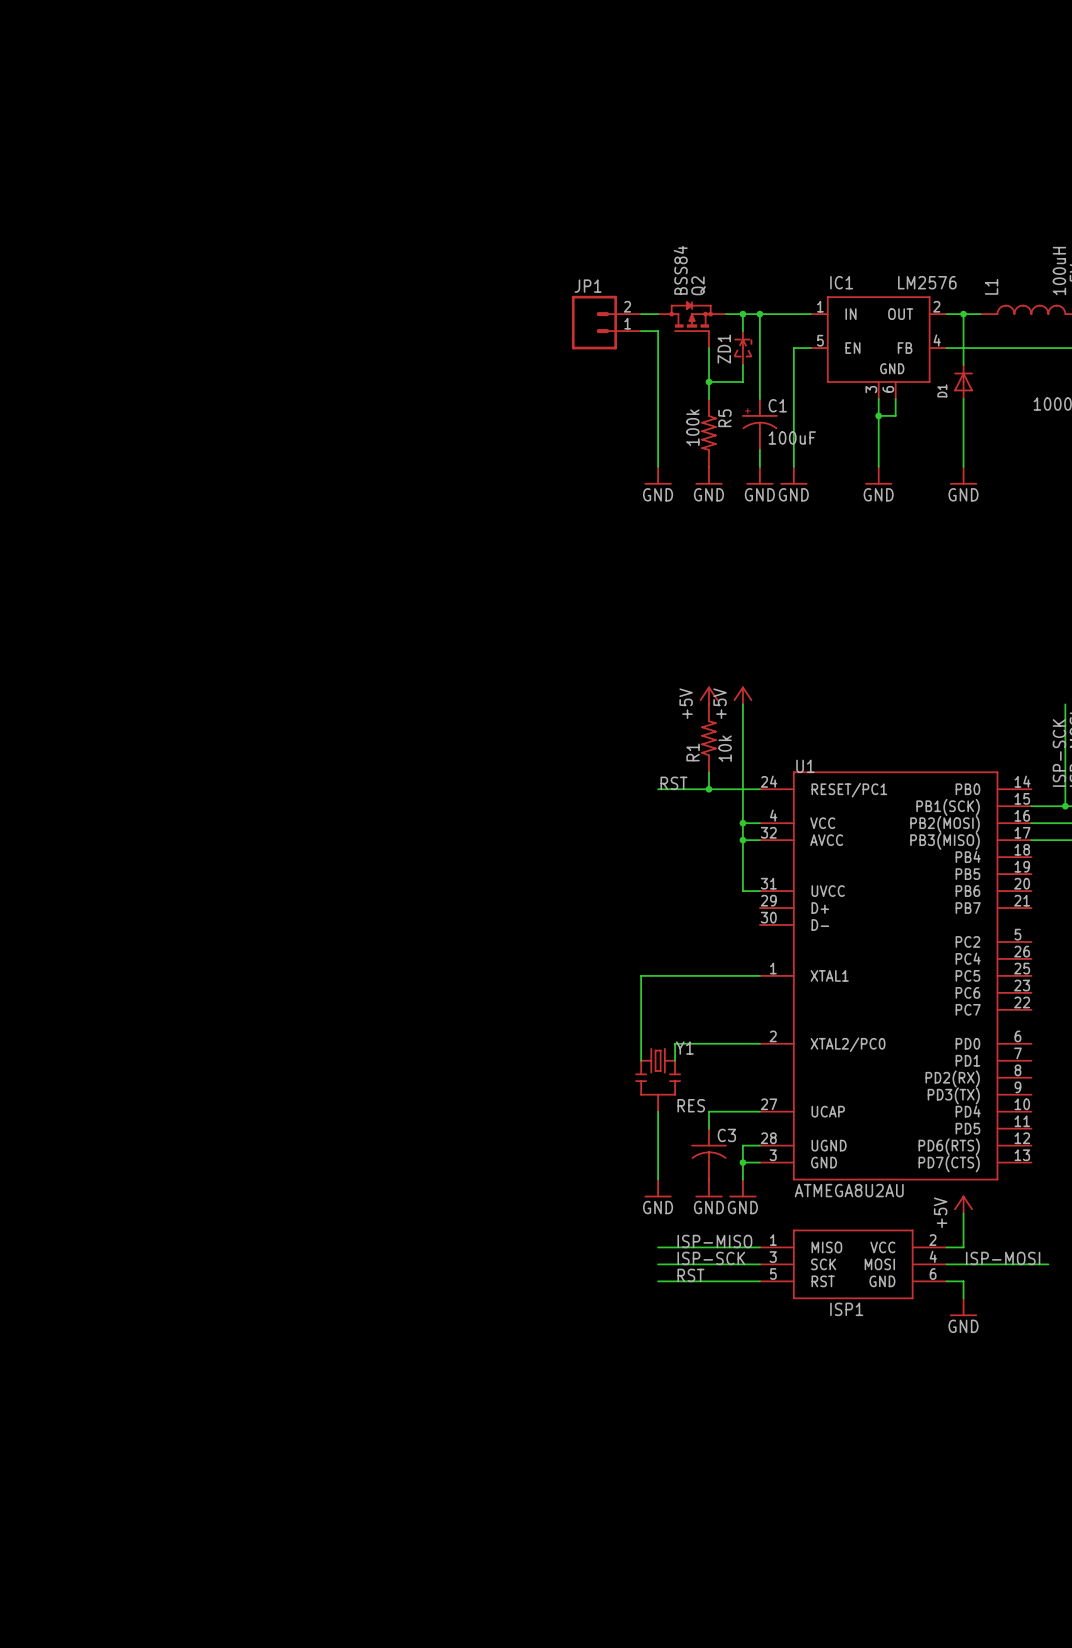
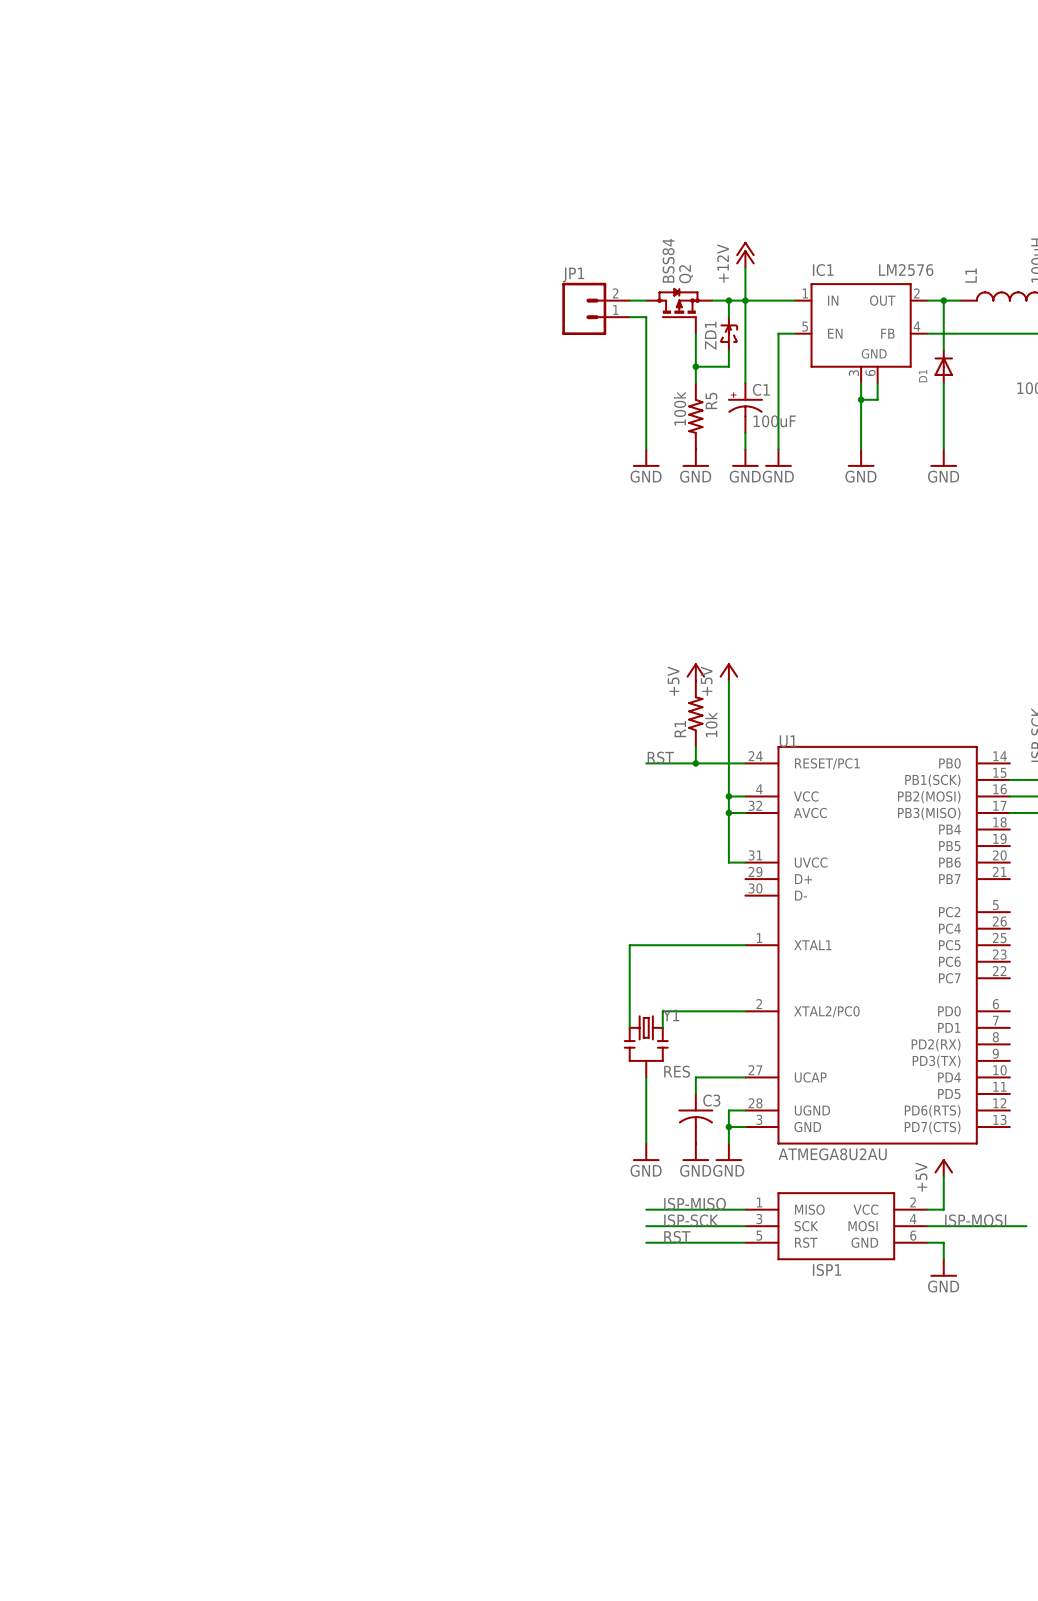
power symbol: none -> +12V (745, 254)
wire: none -> (745, 267) (745, 300)

